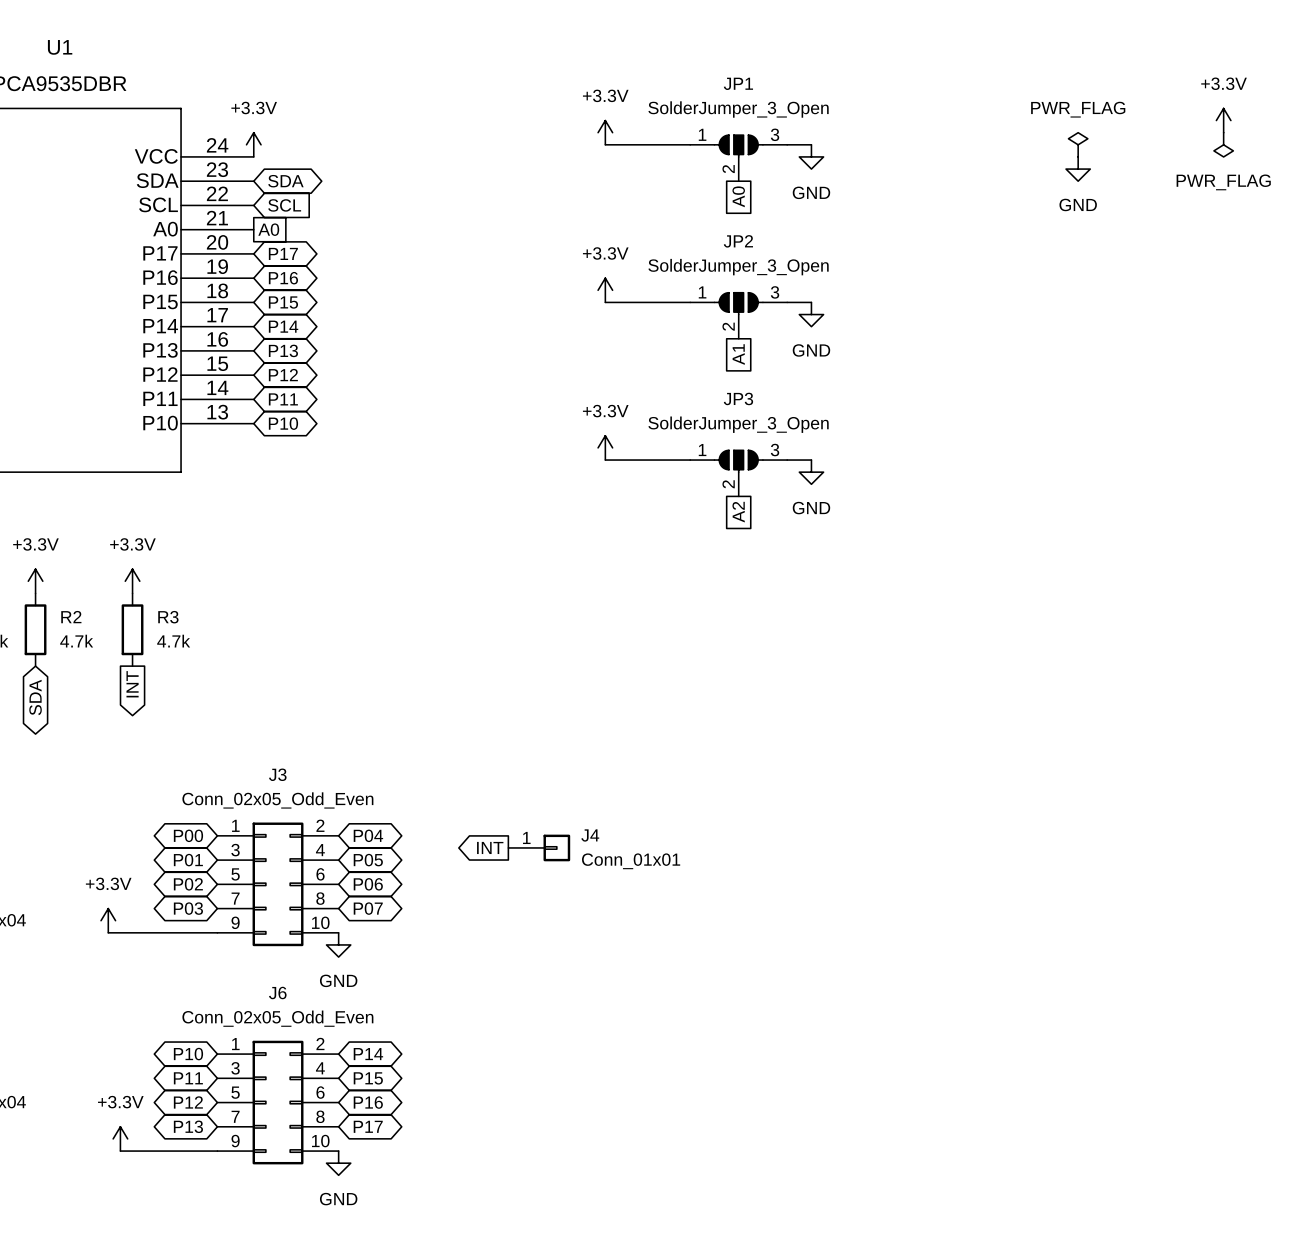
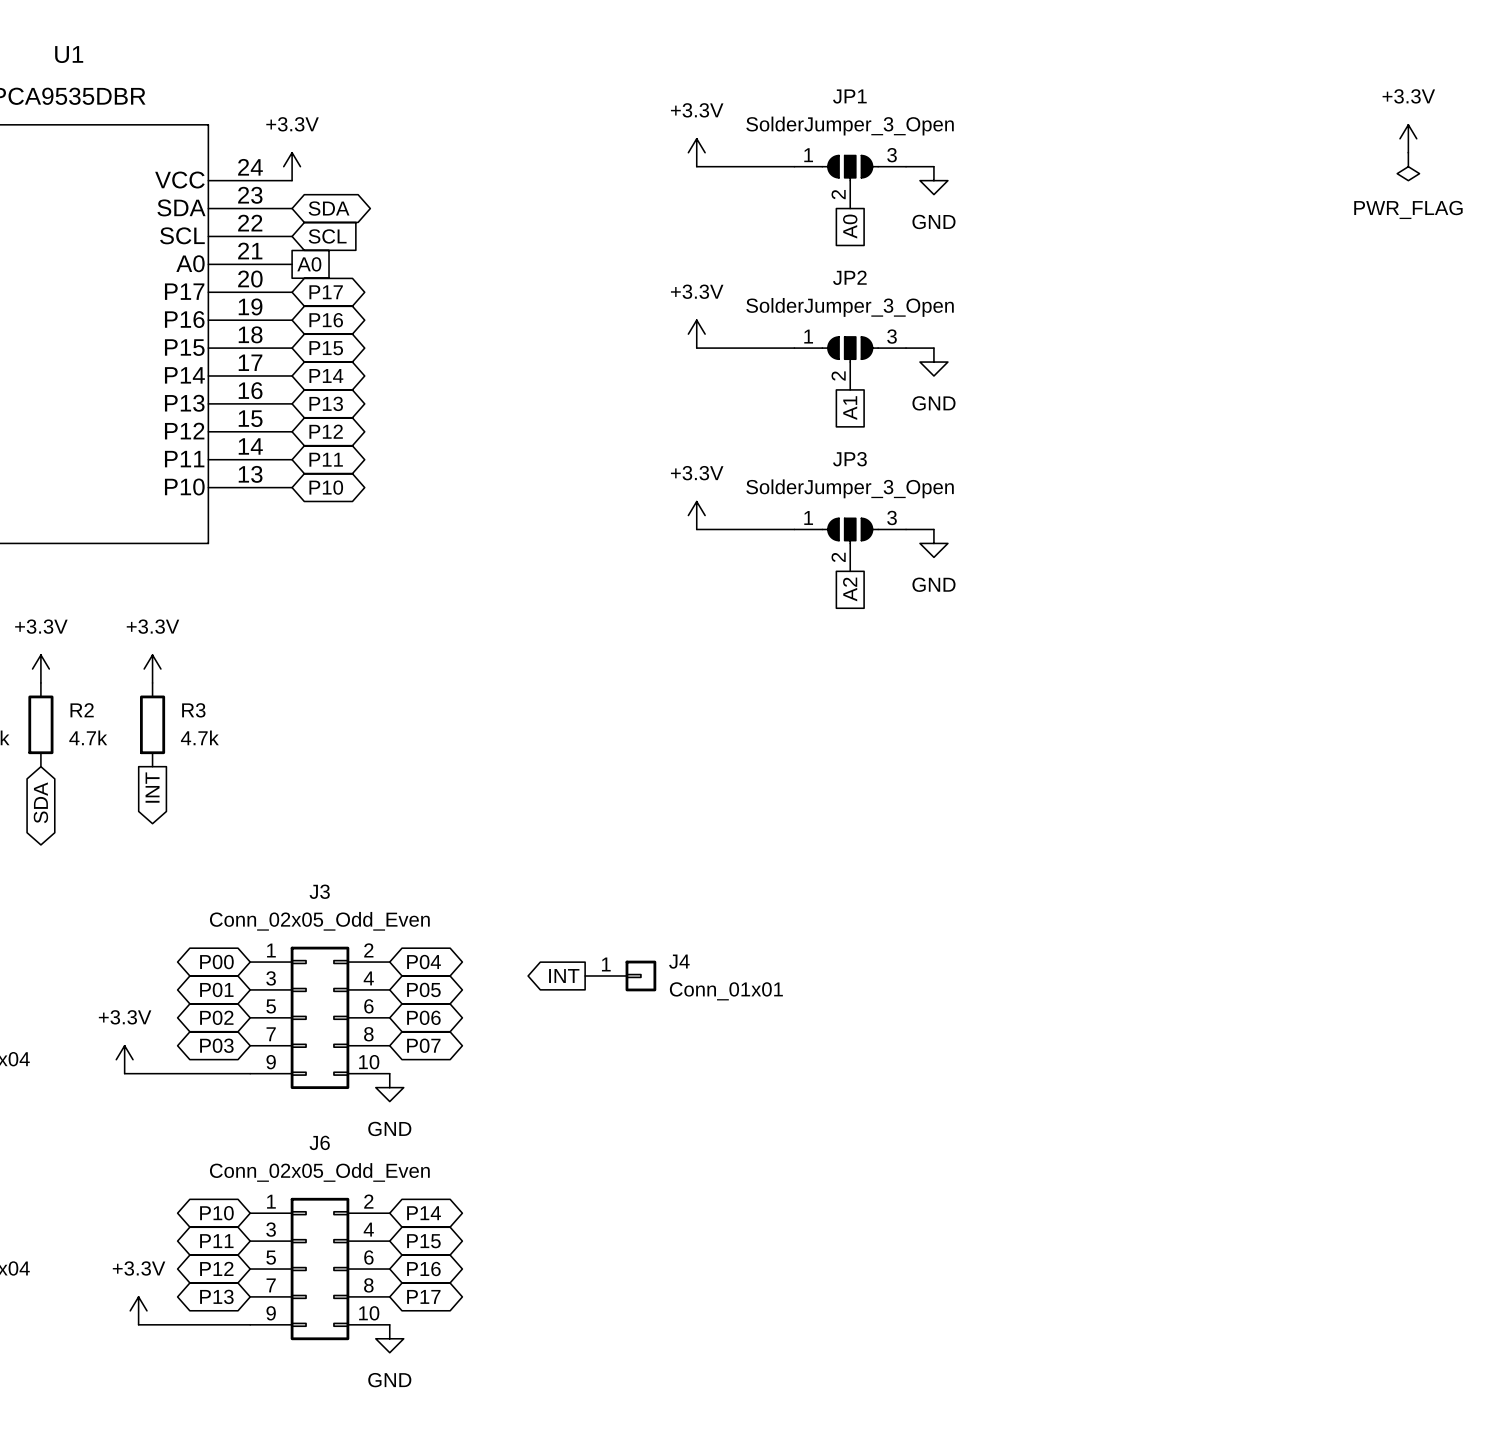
power symbol: PWR_FLAG (1078, 144) -> none
power symbol: GND (1078, 169) -> none

